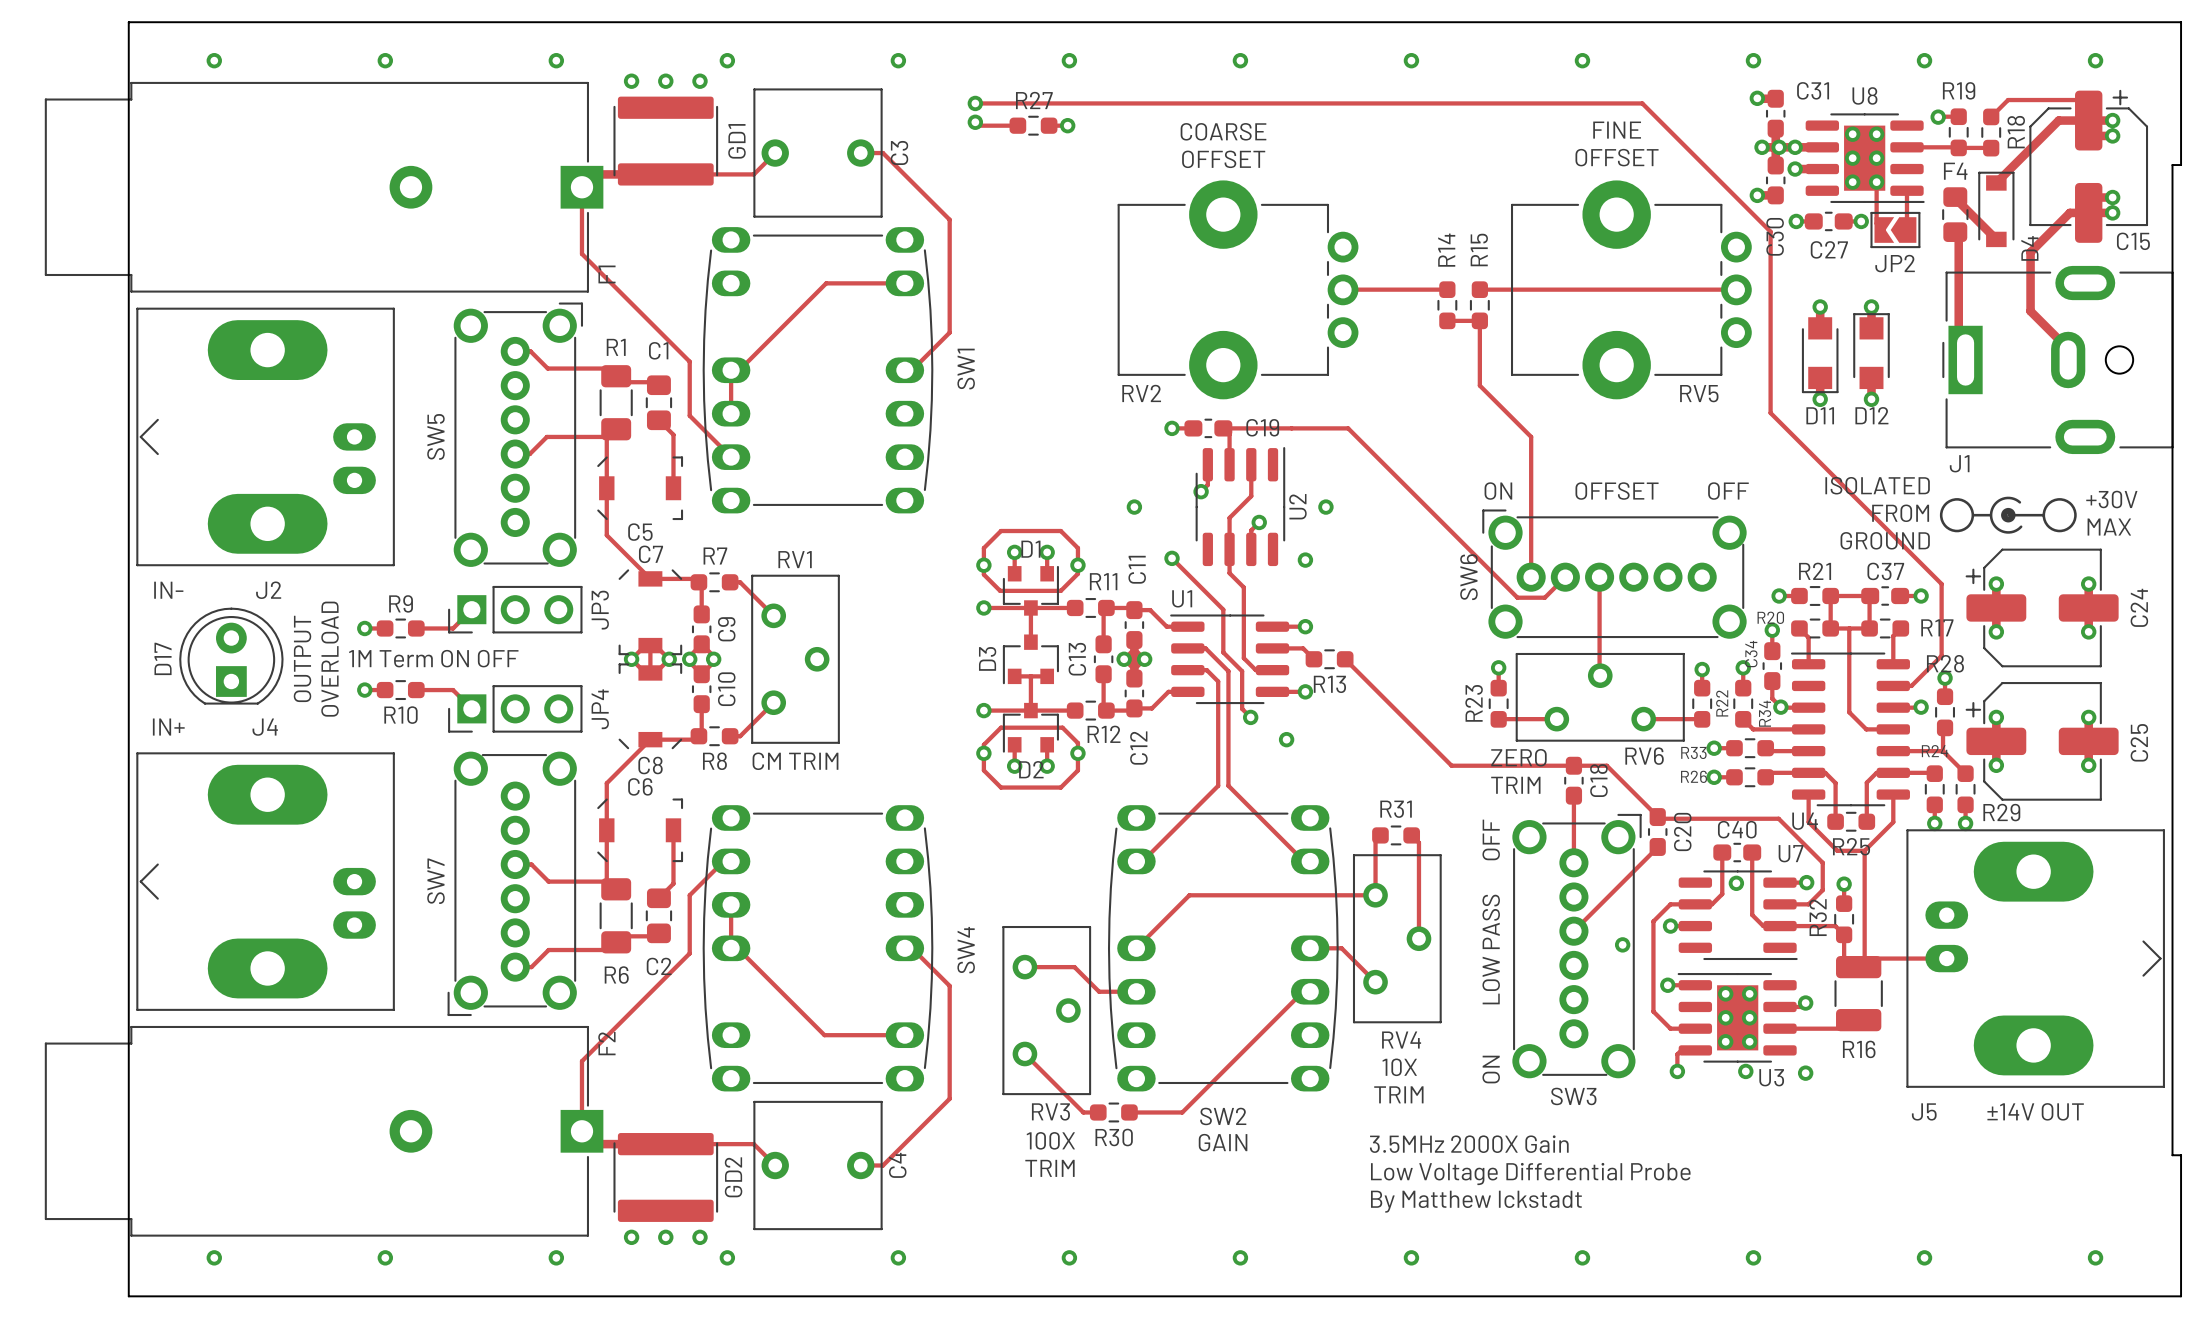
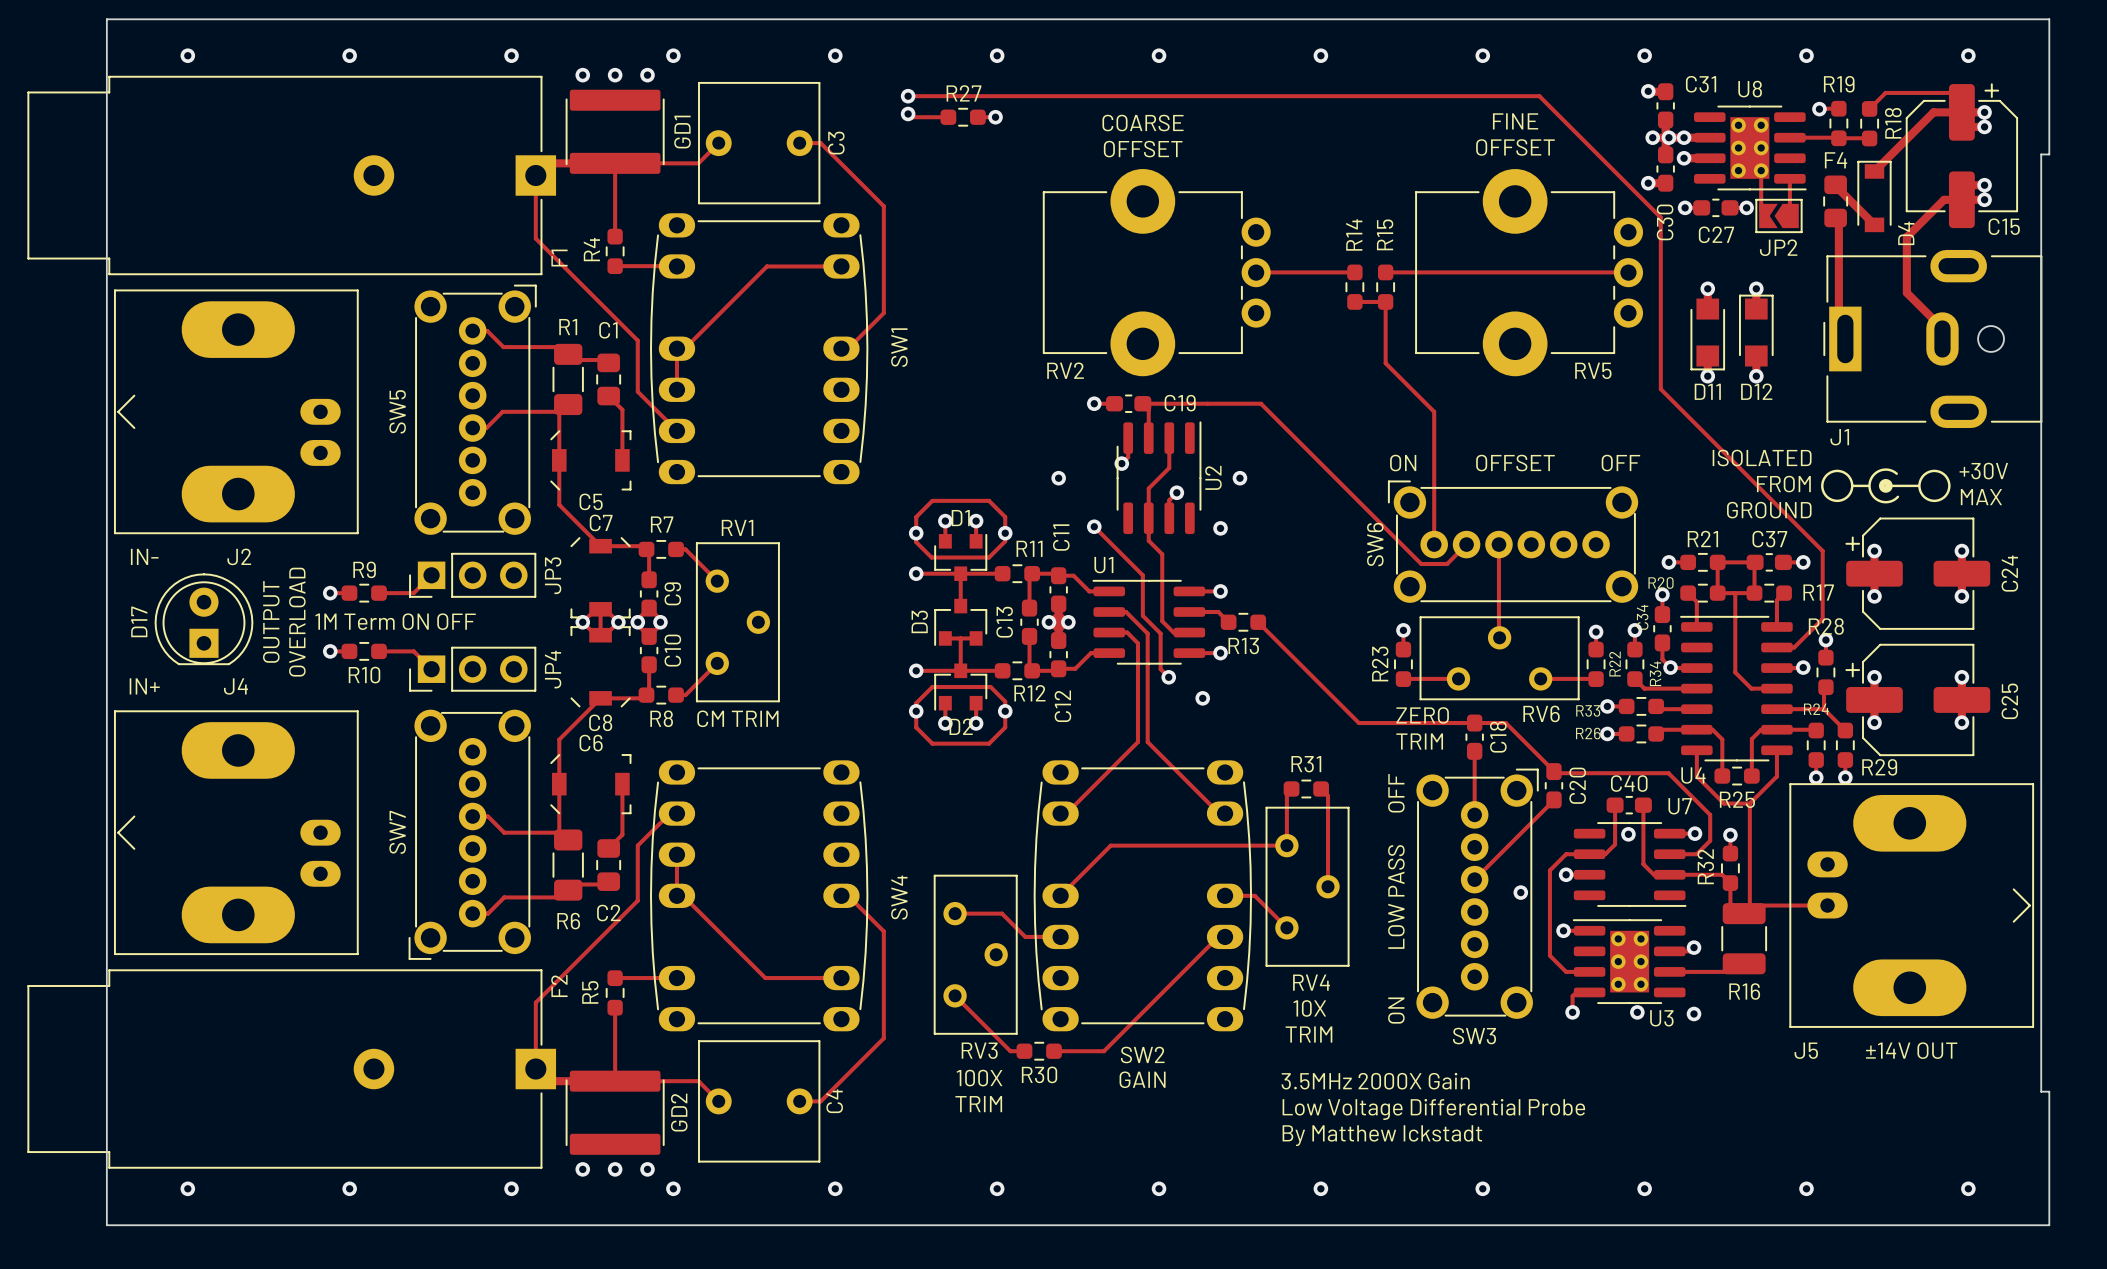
track: none -> (615, 163) (615, 236)
R4: none -> (615, 251)
track: none -> (615, 266) (676, 266)
track: none -> (615, 978) (676, 978)
R5: none -> (615, 992)
track: none -> (615, 1007) (615, 1081)

